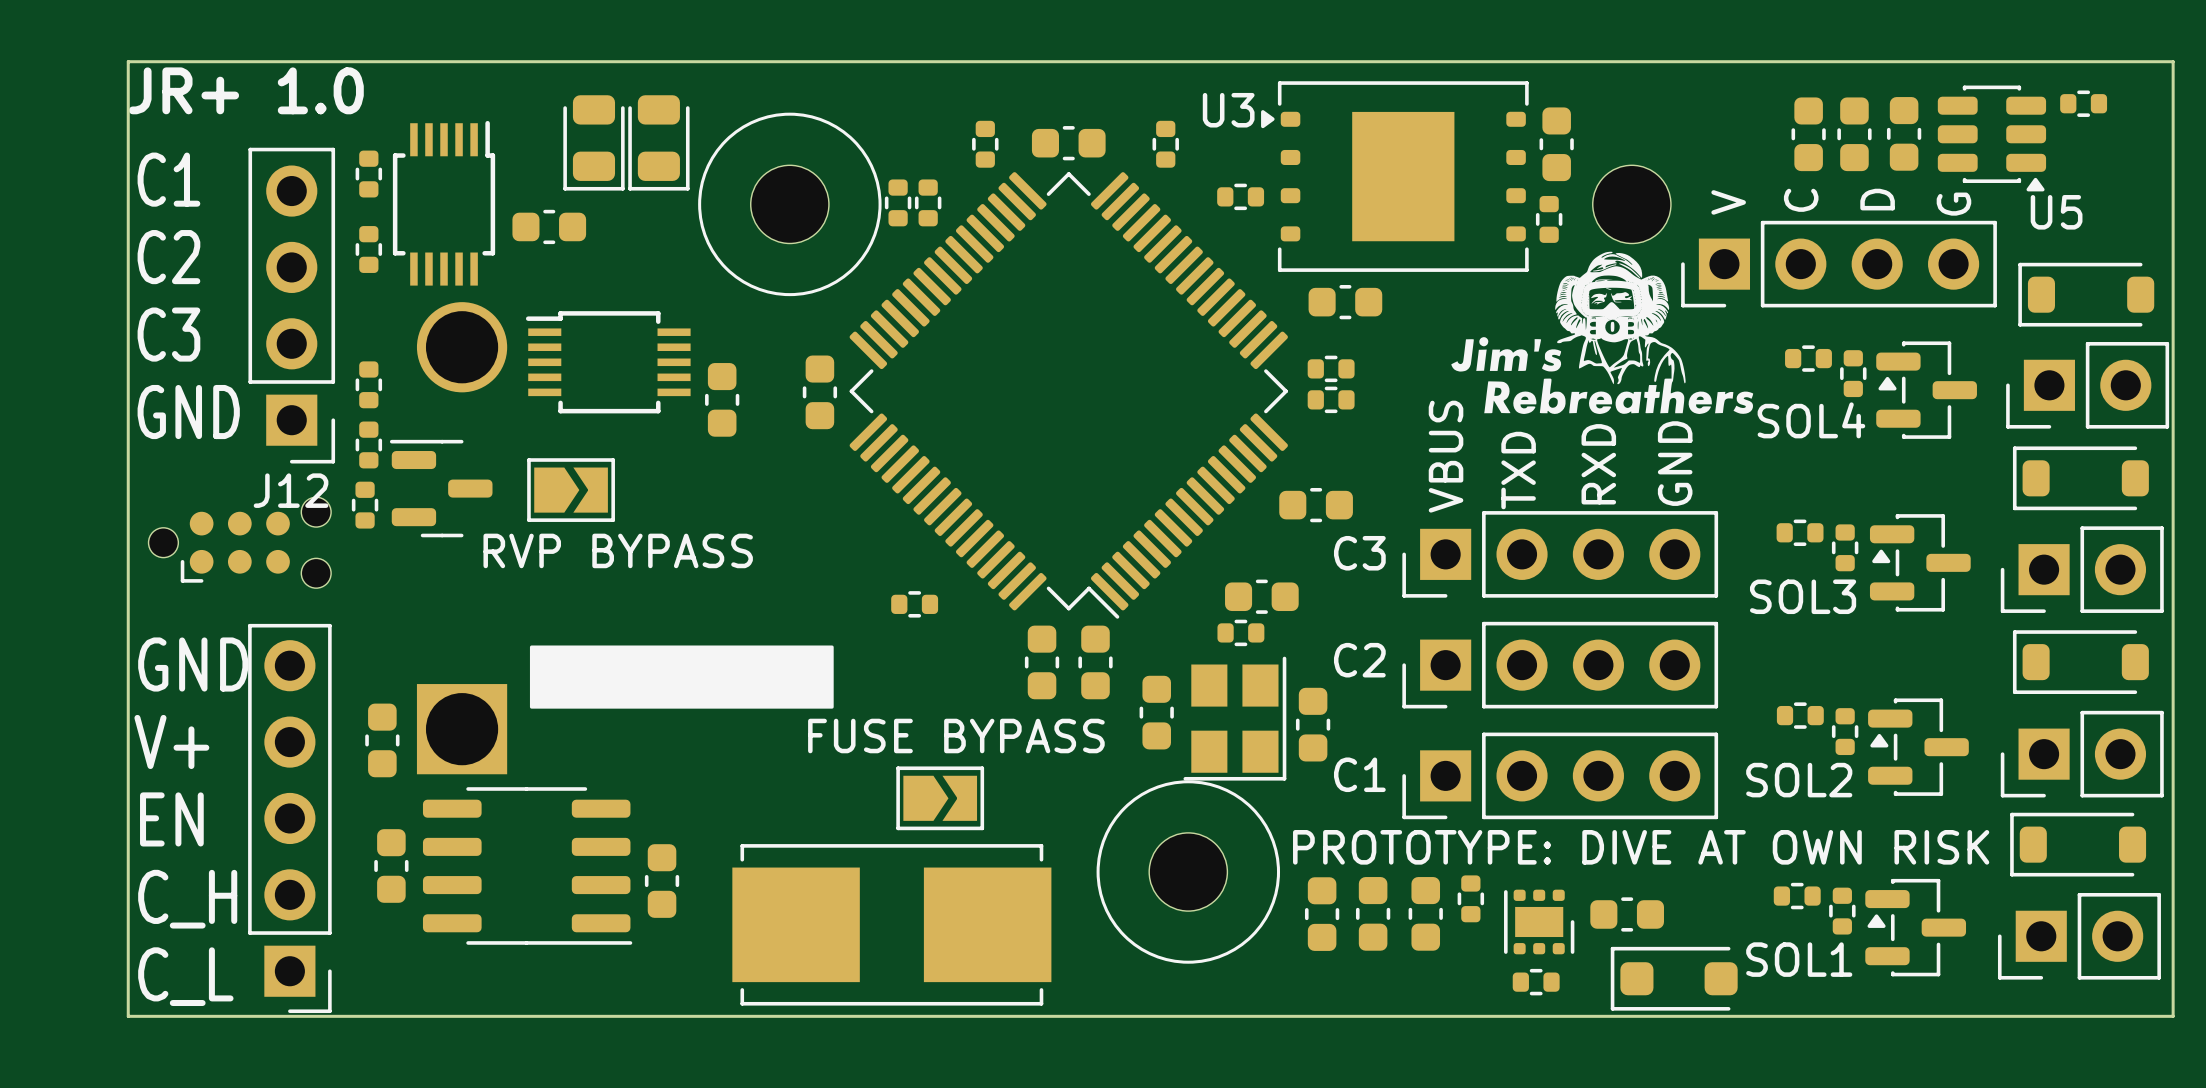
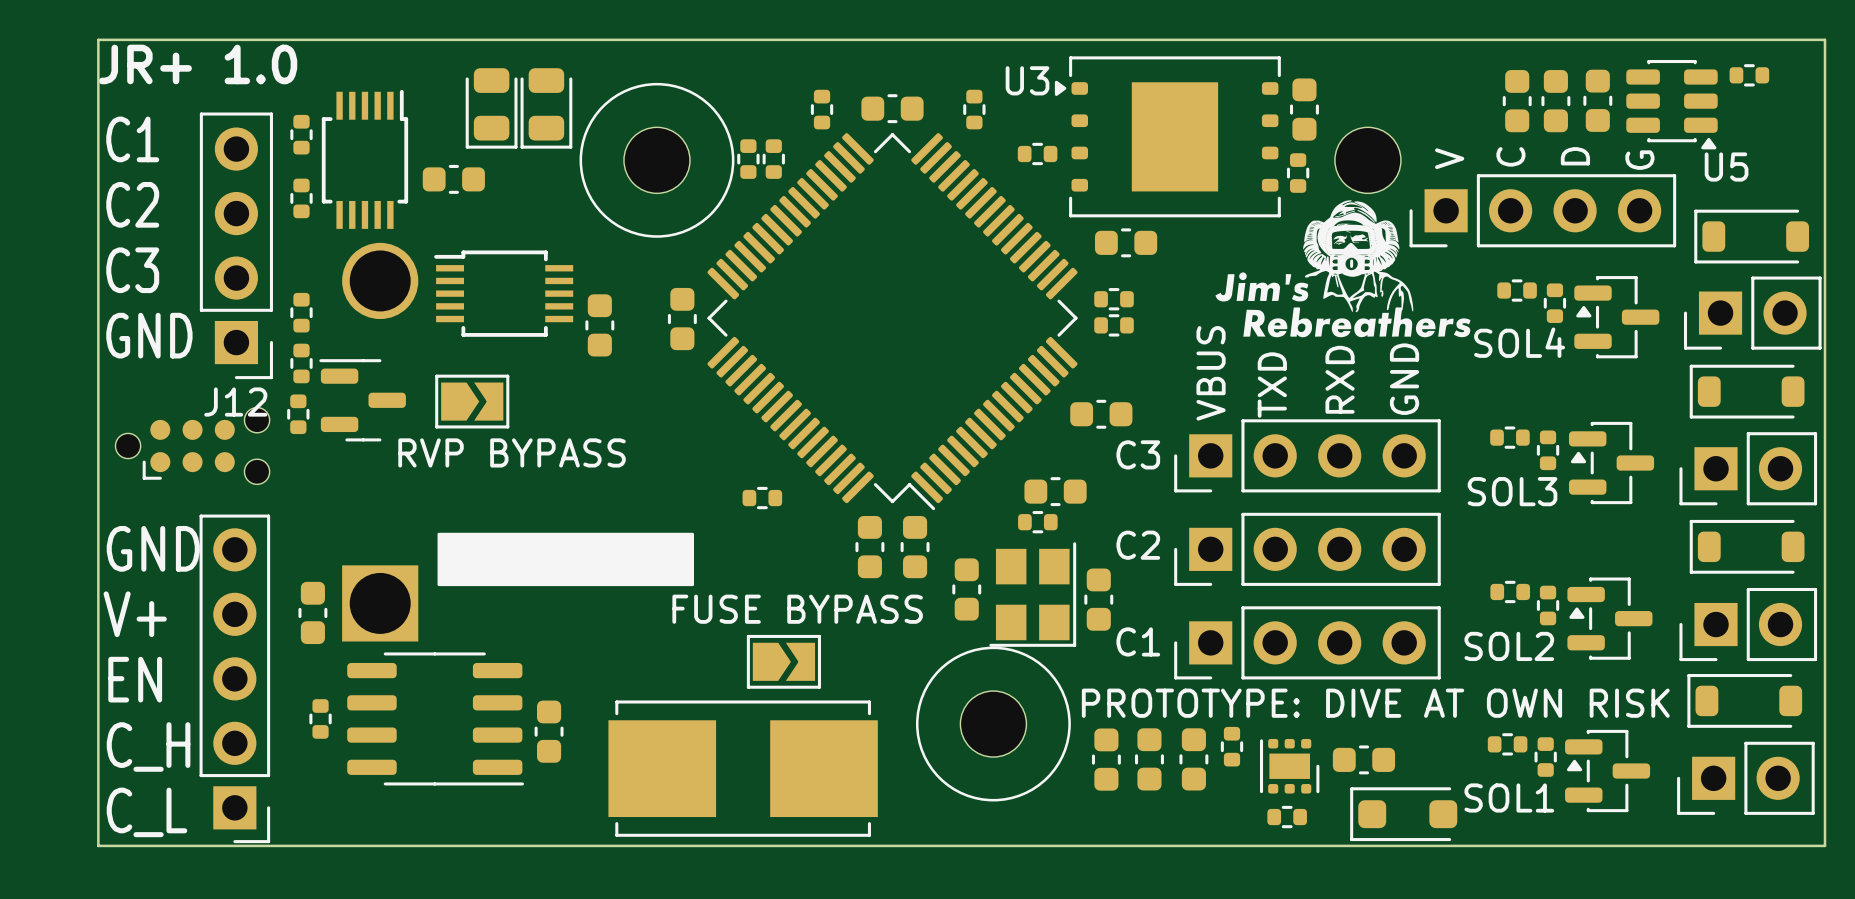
part footprint: [374, 829, 409, 903] -> [309, 699, 332, 739]

